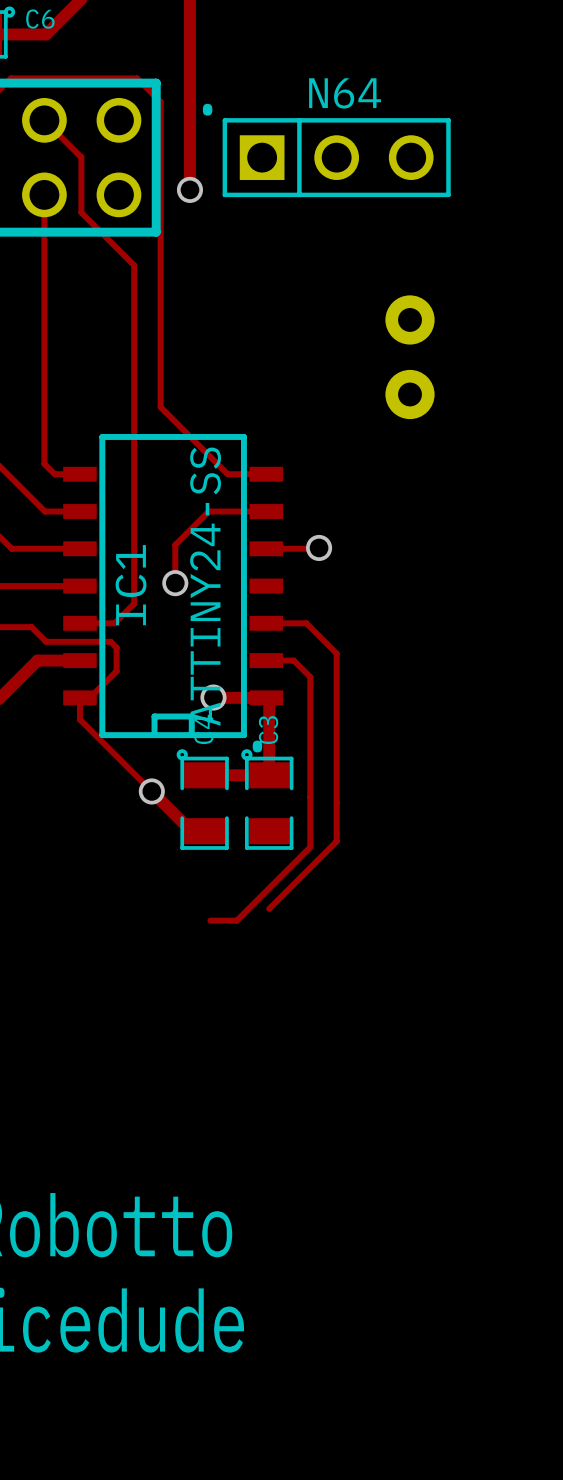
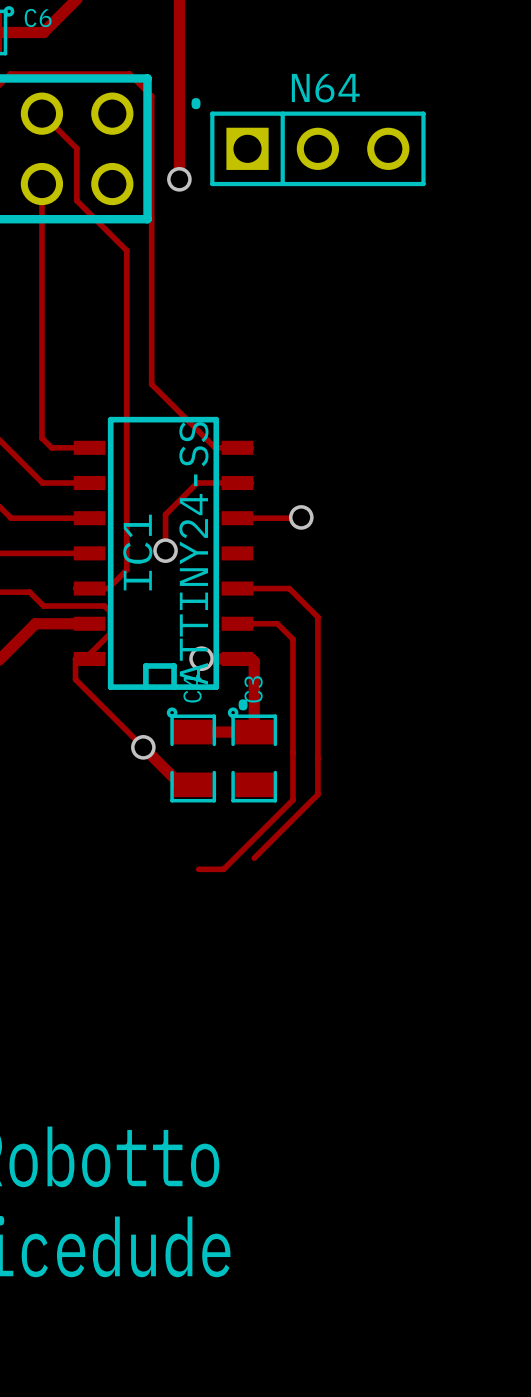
part: (410, 357) -> none
IC1 footprint: [63, 434, 284, 739] -> [73, 416, 254, 690]
IC1 name position: IC1 (131, 585) -> IC1 (137, 552)

